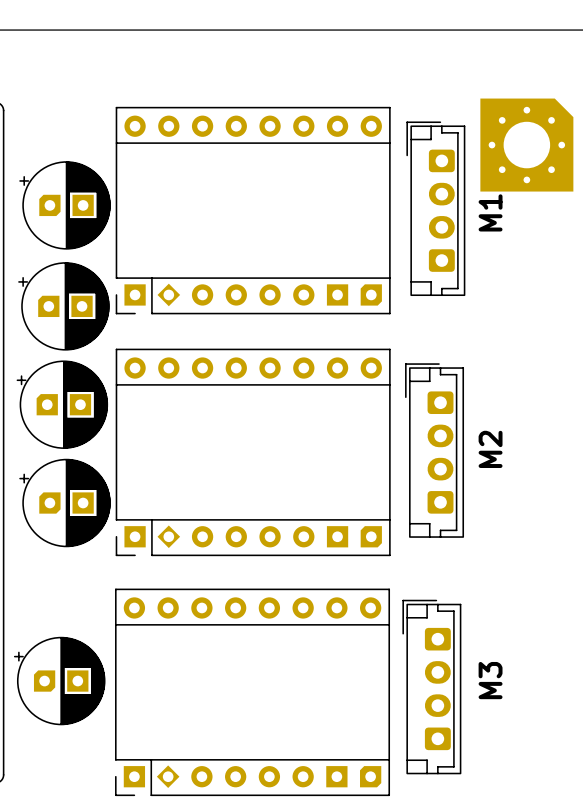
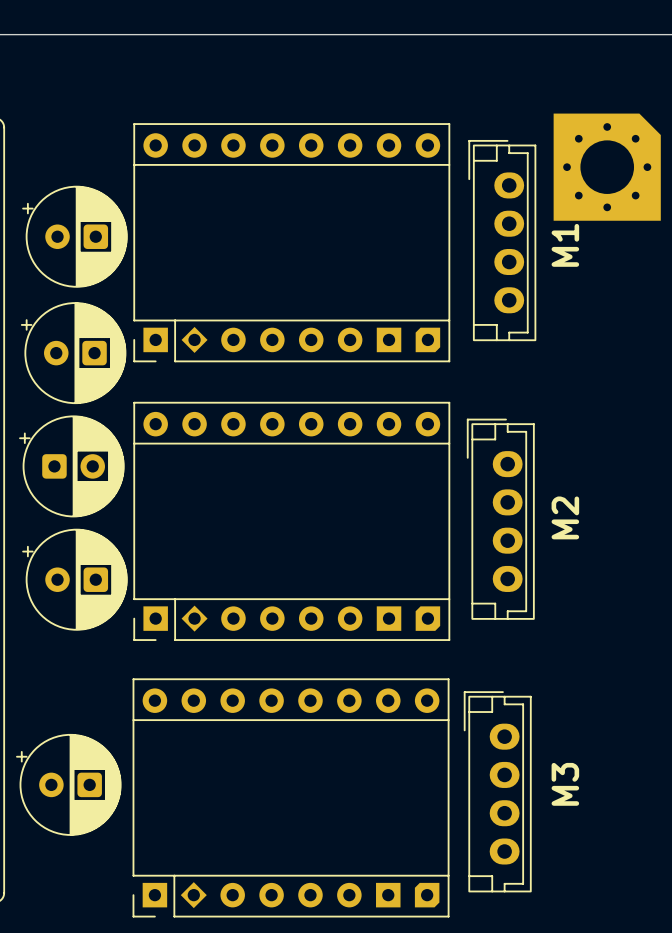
part footprint: [406, 121, 466, 297] -> [468, 139, 537, 342]
part footprint: [19, 161, 111, 250] -> [22, 185, 128, 288]
part footprint: [18, 262, 110, 351] -> [20, 302, 127, 405]
part footprint: [16, 360, 109, 449] -> [19, 415, 125, 518]
part footprint: [405, 363, 465, 538] -> [466, 418, 535, 620]
part footprint: [19, 458, 111, 548] -> [22, 528, 128, 631]
part footprint: [402, 599, 462, 775] -> [463, 691, 532, 893]
part footprint: [13, 636, 106, 726] -> [16, 733, 122, 836]

